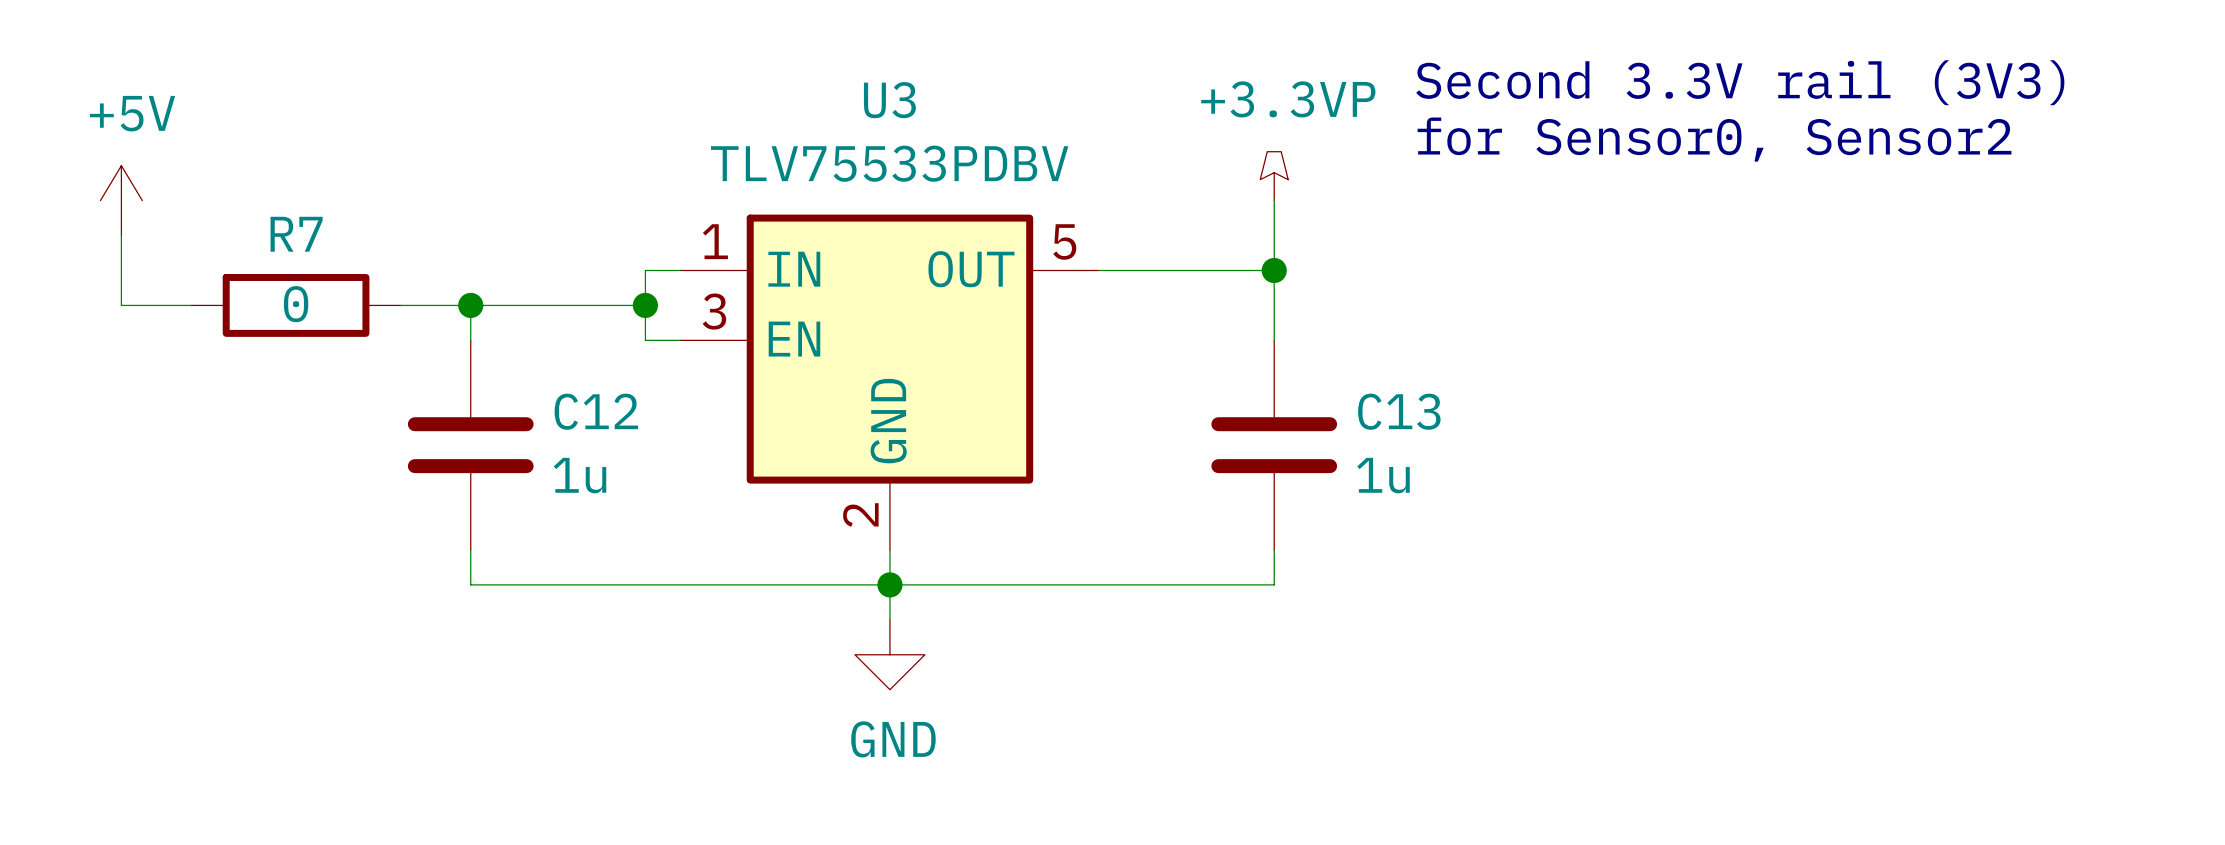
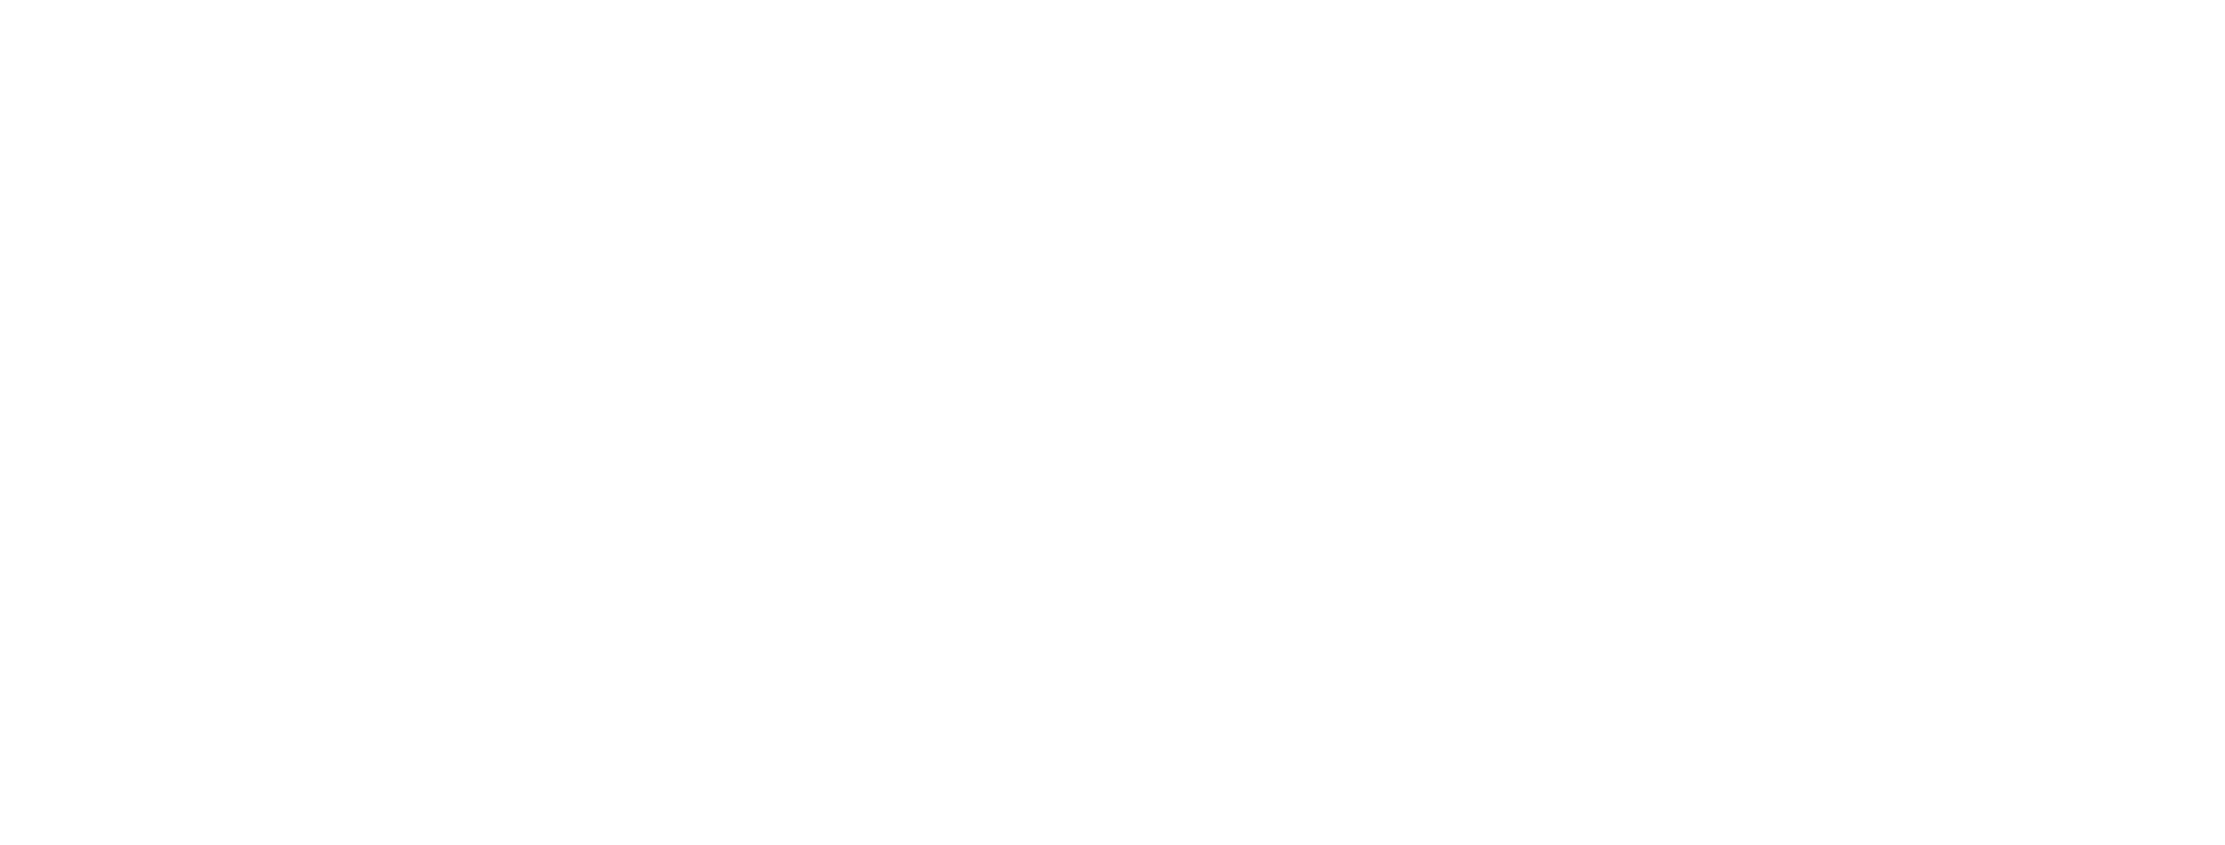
text: Second 3.3V rail (3V3) (1740, 82) -> none
text: for Sensor0, Sensor2 (1714, 139) -> none
power symbol: +3.3VP (1274, 176) -> none
power symbol: +5V (121, 200) -> none
wire: (1274, 200) (1274, 340) -> none
wire: (121, 235) (121, 305) (191, 305) -> none
wire: (680, 270) (645, 270) (645, 340) (680, 340) -> none
wire: (1099, 270) (1274, 270) -> none
junction: (1274, 270) -> none
R7: 0 (296, 305) -> none
wire: (400, 305) (645, 305) -> none
wire: (470, 305) (470, 340) -> none
junction: (470, 305) -> none
junction: (645, 305) -> none
U3: TLV75533PDBV (889, 382) -> none
C12: 1u (470, 445) -> none
C13: 1u (1274, 445) -> none
wire: (470, 549) (470, 584) (1274, 584) (1274, 549) -> none
wire: (889, 549) (889, 619) -> none
junction: (889, 584) -> none
power symbol: GND (889, 654) -> none

